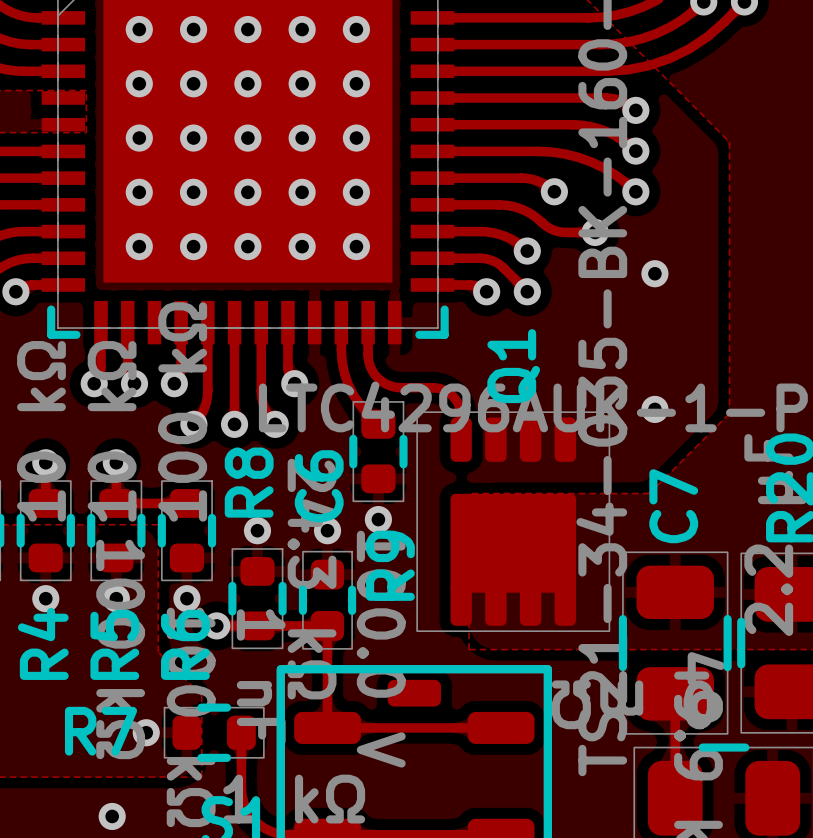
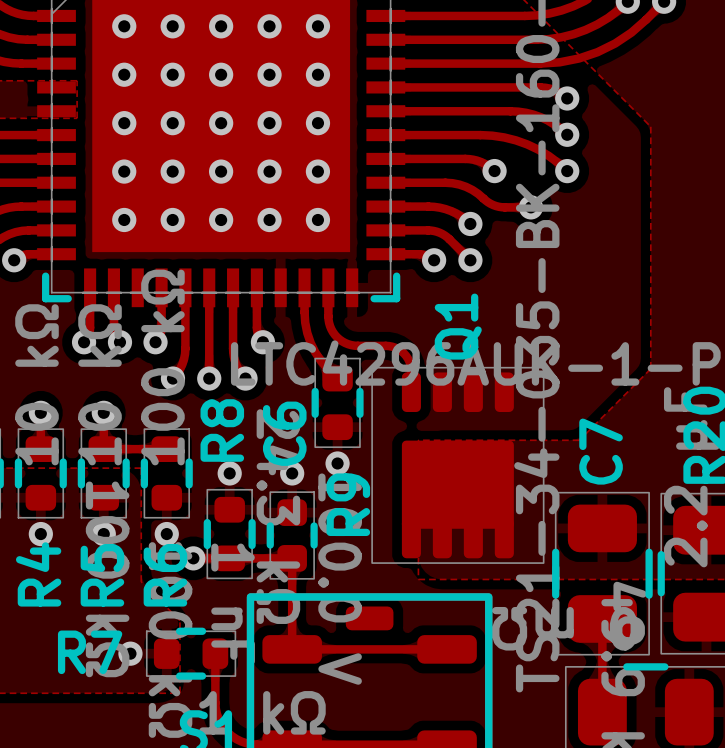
via: (654, 273) -> none
via: (654, 409) -> none
via: (112, 816) -> none

